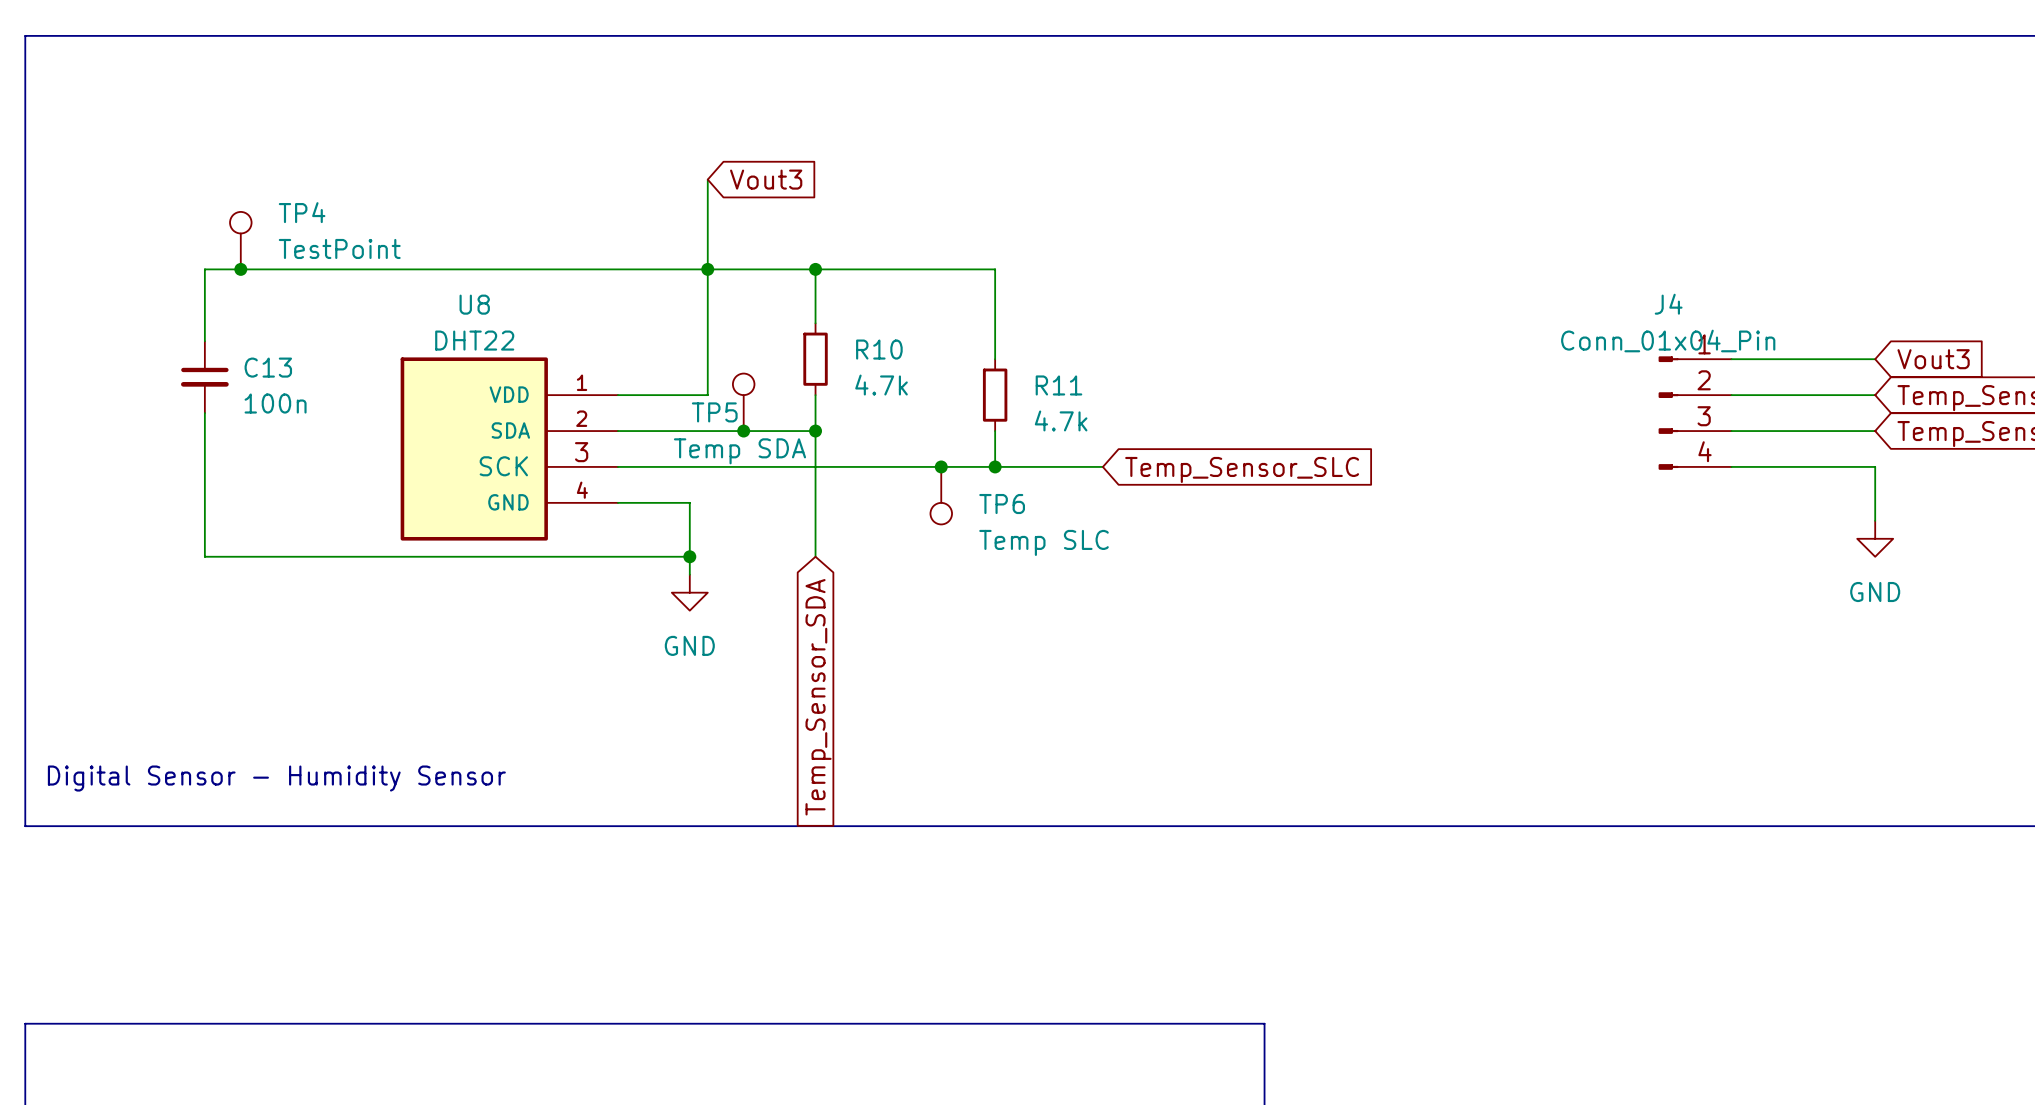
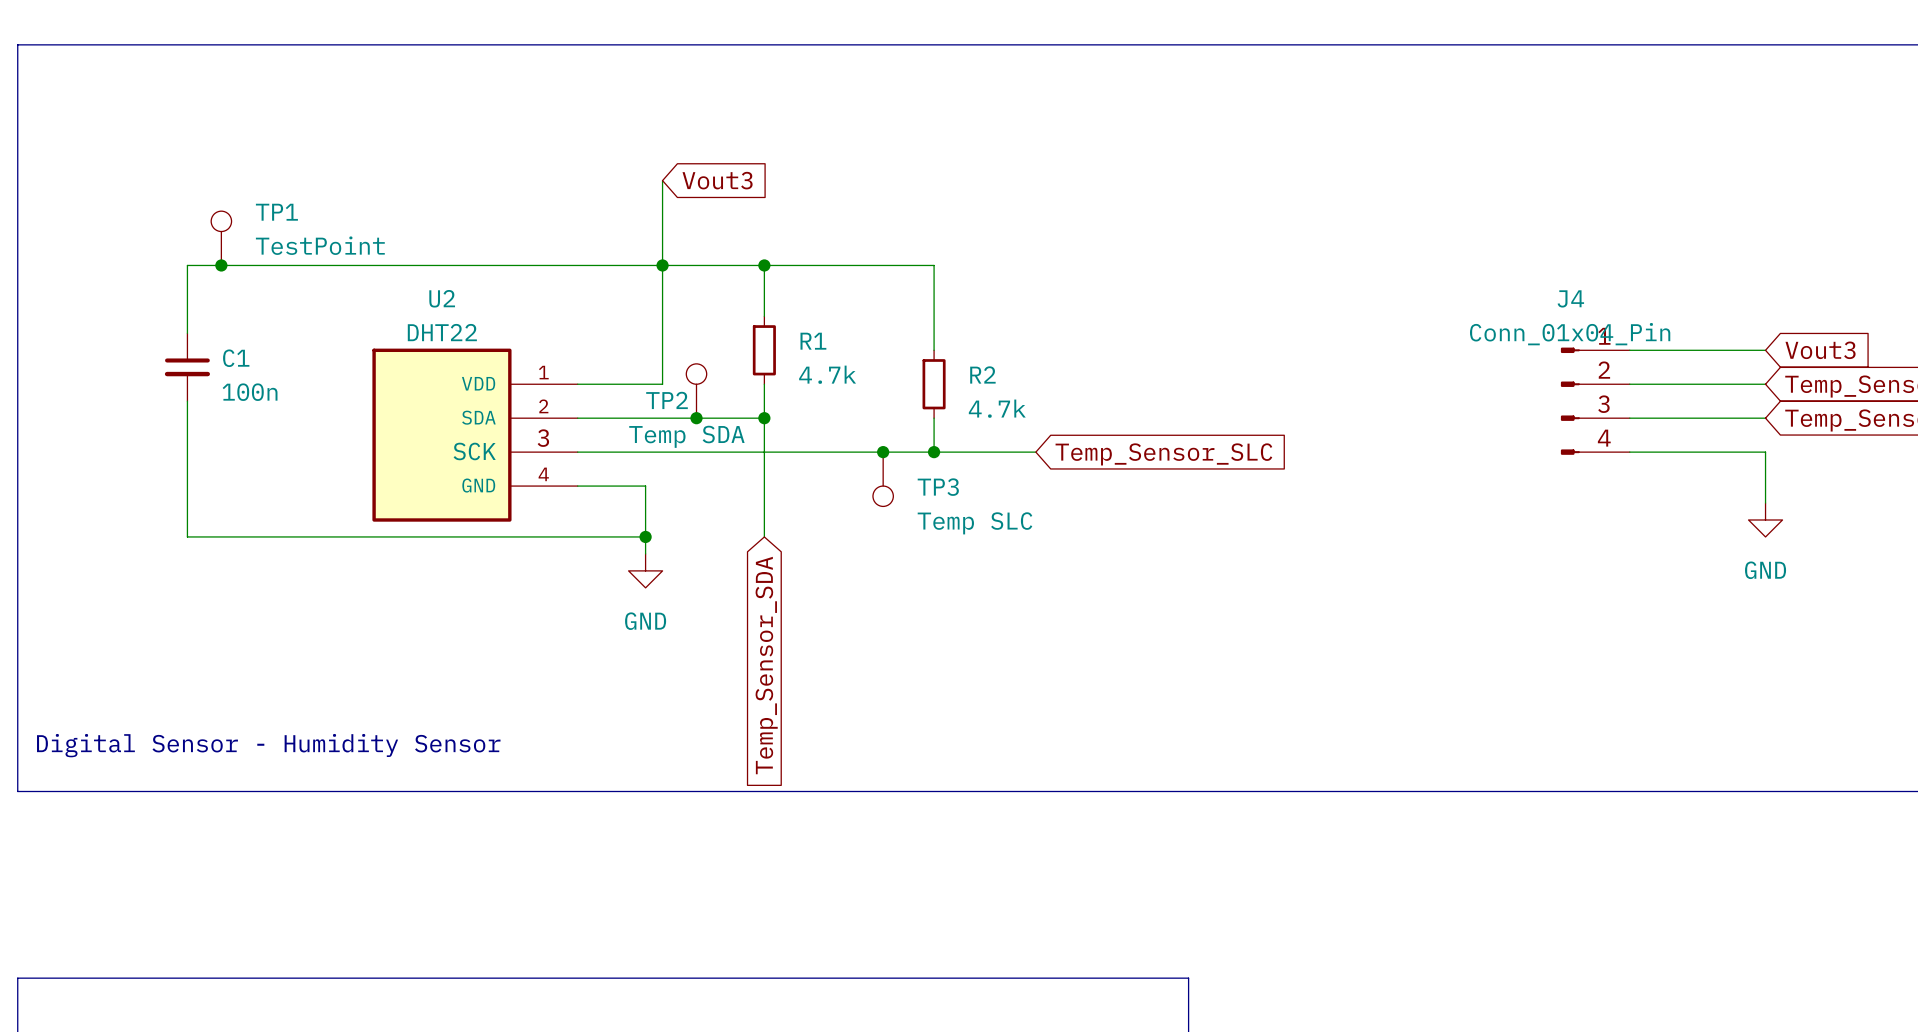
TP4 name: TP4 (302, 212) -> TP1 (276, 212)
U8 name: U8 (474, 304) -> U2 (442, 298)
R10 name: R10 (879, 349) -> R1 (813, 341)
C13 name: C13 (268, 367) -> C1 (236, 358)
R11 name: R11 (1058, 385) -> R2 (982, 374)
TP5 name: TP5 (714, 412) -> TP2 (667, 400)
TP6 name: TP6 (1002, 504) -> TP3 (938, 487)

